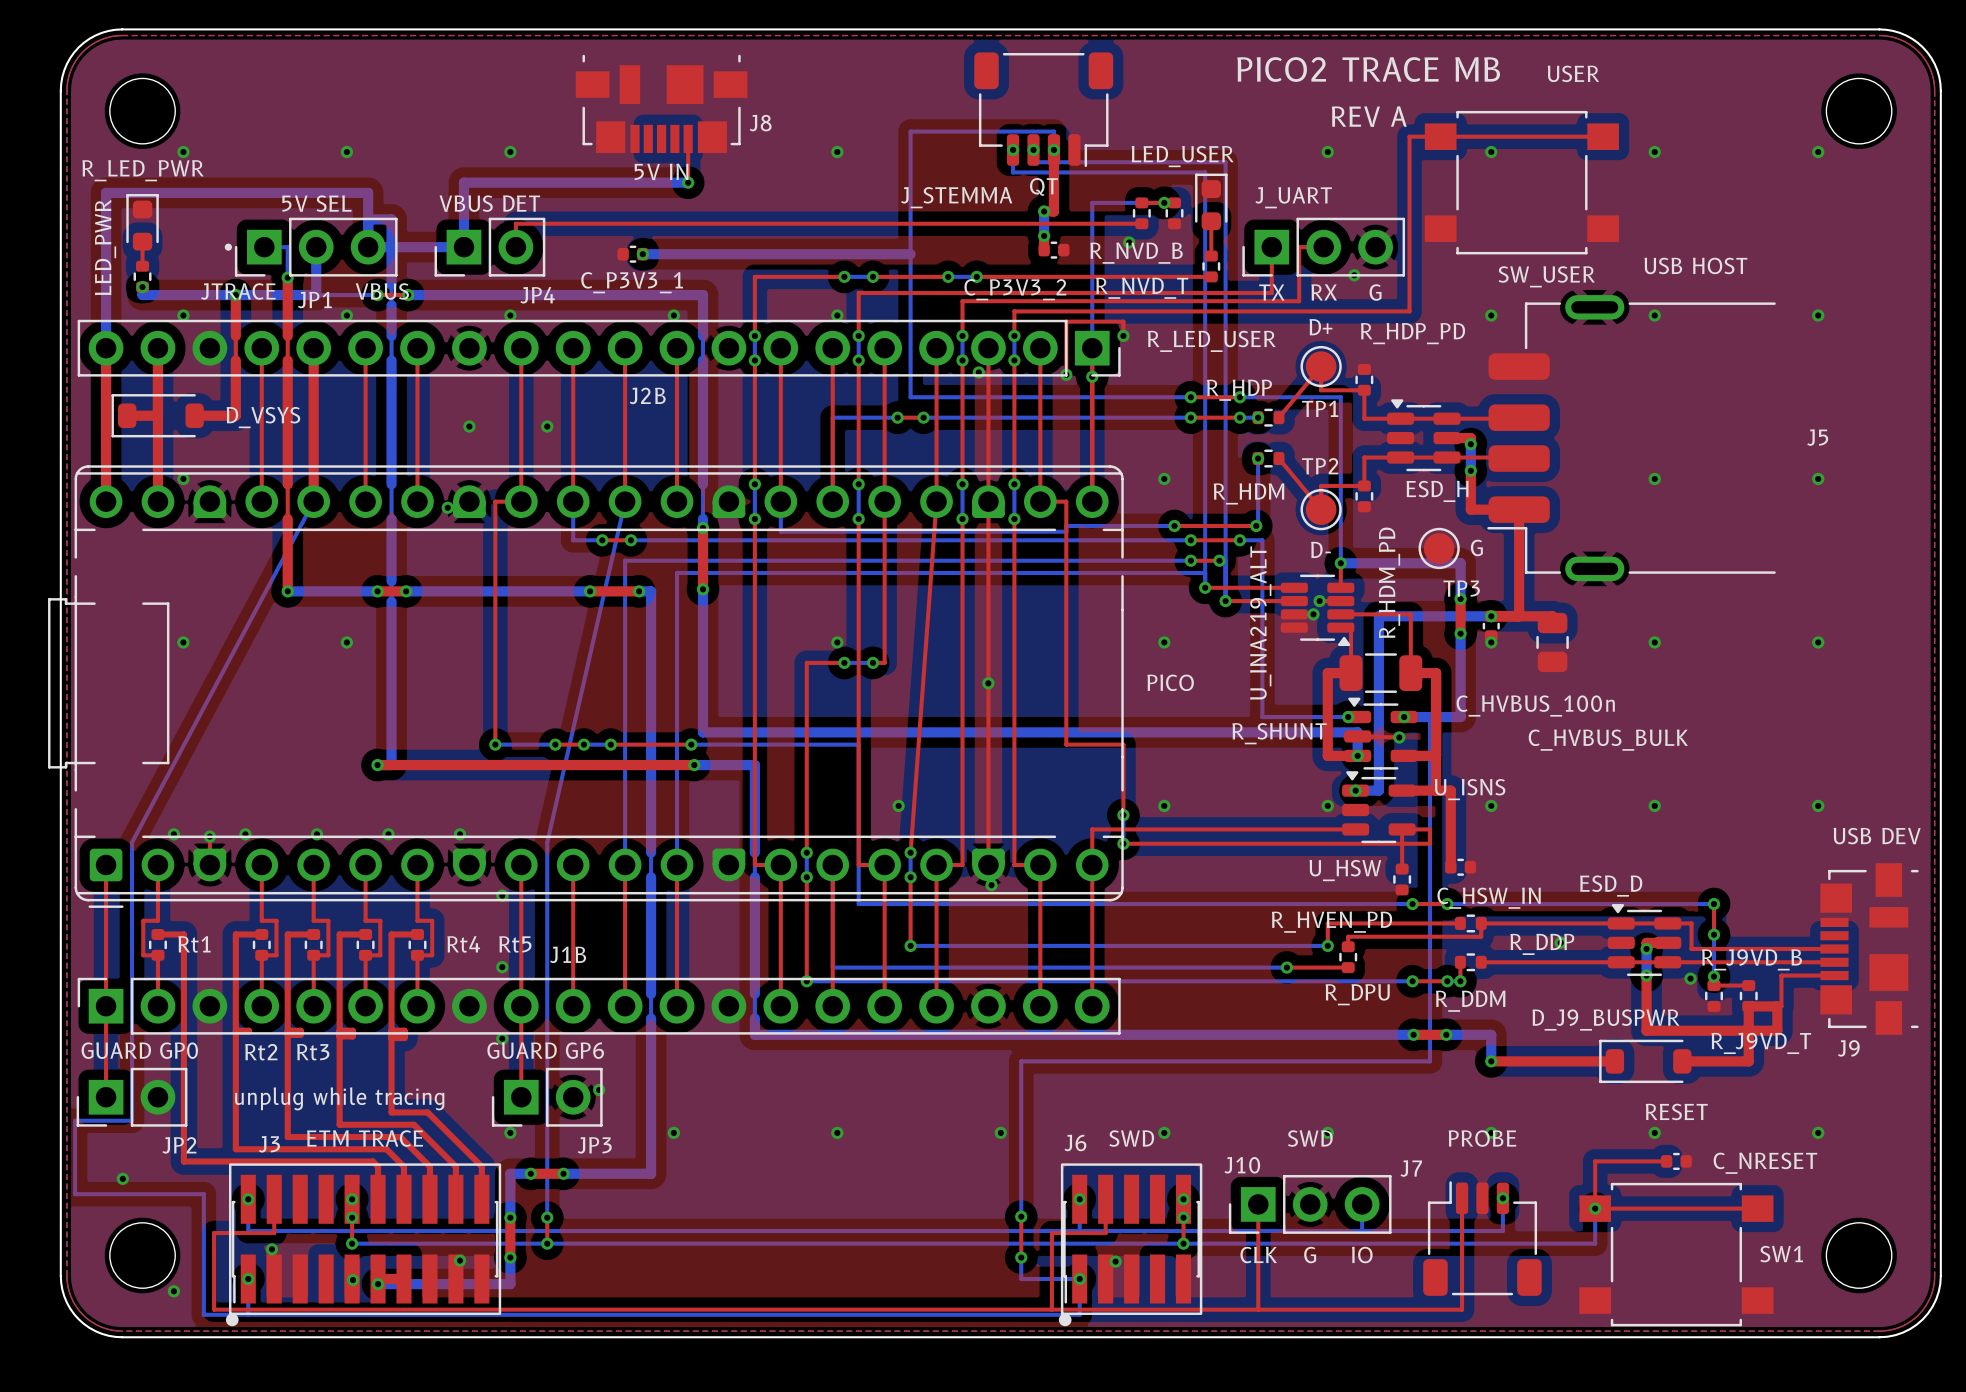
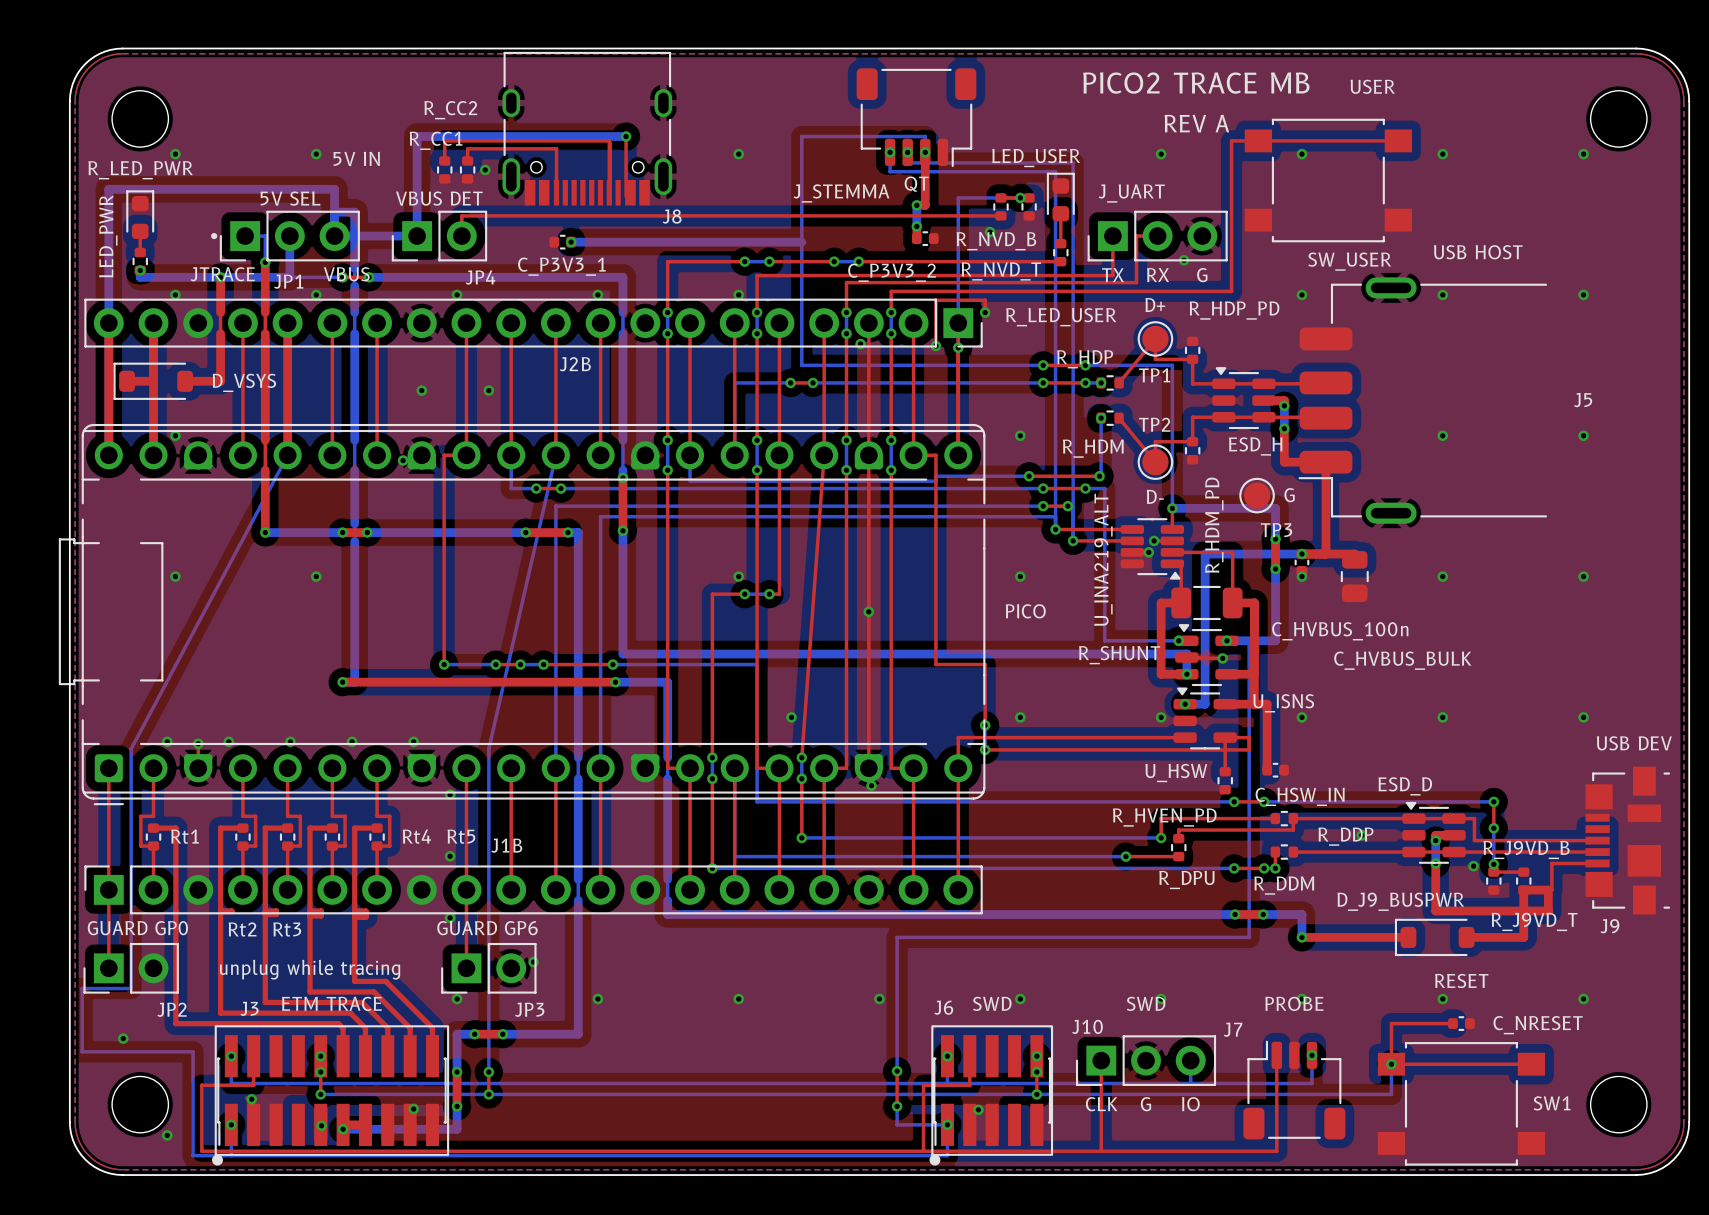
J8 footprint: [575, 54, 748, 154] -> [502, 51, 673, 206]
J8 name position: J8 (760, 123) -> J8 (672, 216)
top track: none -> (626, 136) (626, 196)
via position: (510, 152) -> (485, 169)
top track: none -> (444, 160) (444, 140) (609, 140) (609, 192)
top track: none -> (467, 160) (467, 148) (556, 148) (556, 192)
R_CC1: none -> (444, 169)
R_CC2: none -> (467, 169)
text position: 5V IN (661, 171) -> 5V IN (356, 158)
bottom track: (463, 182) (688, 182) -> (417, 180) (417, 136) (626, 136)
via position: (688, 182) -> (626, 136)

